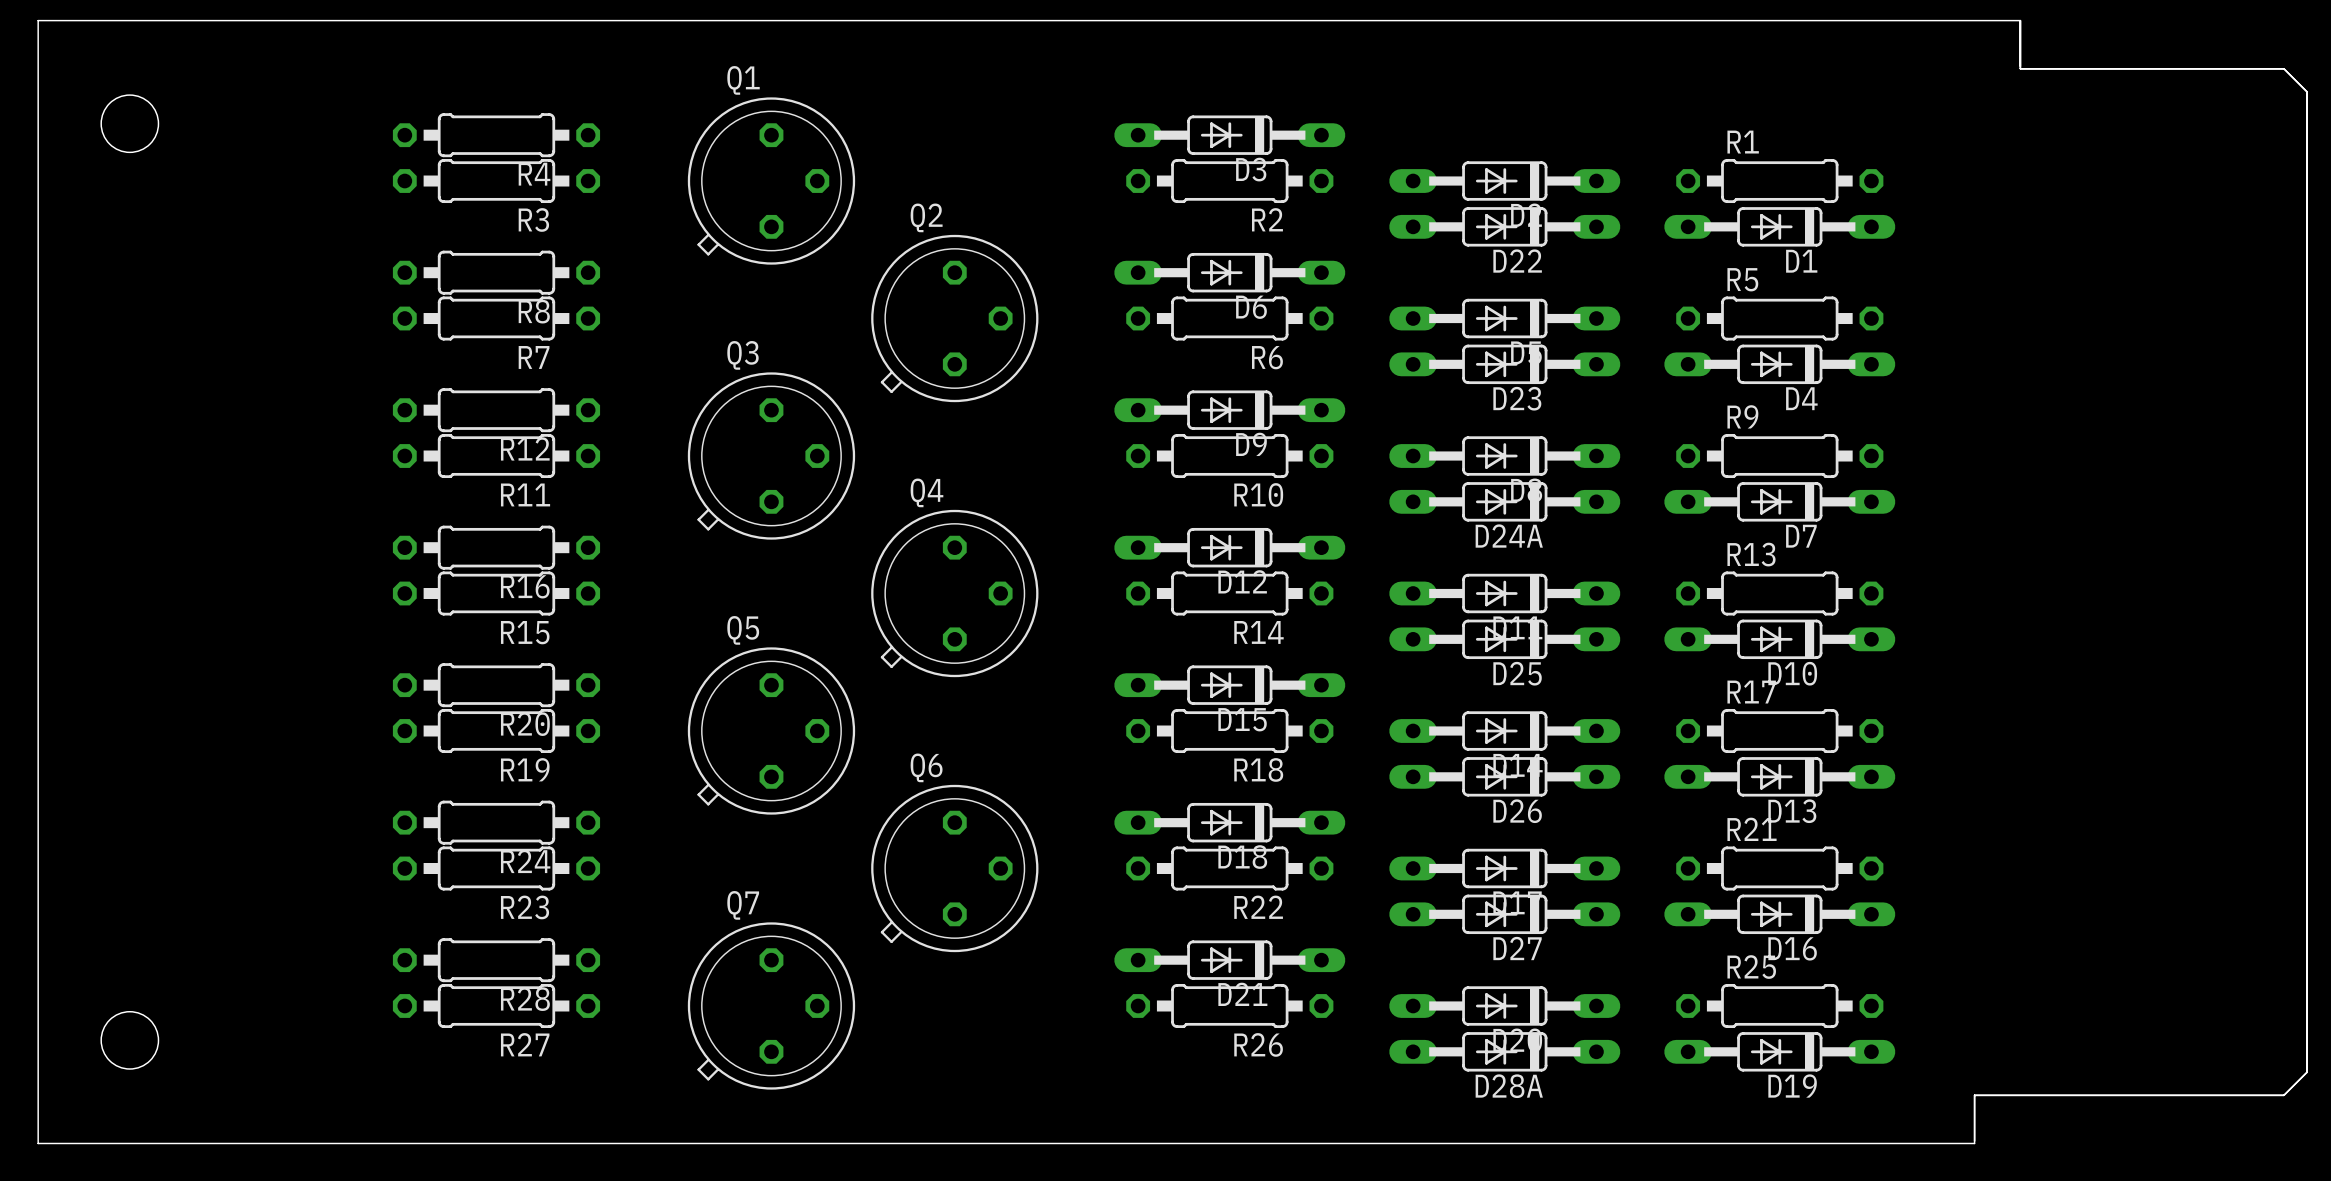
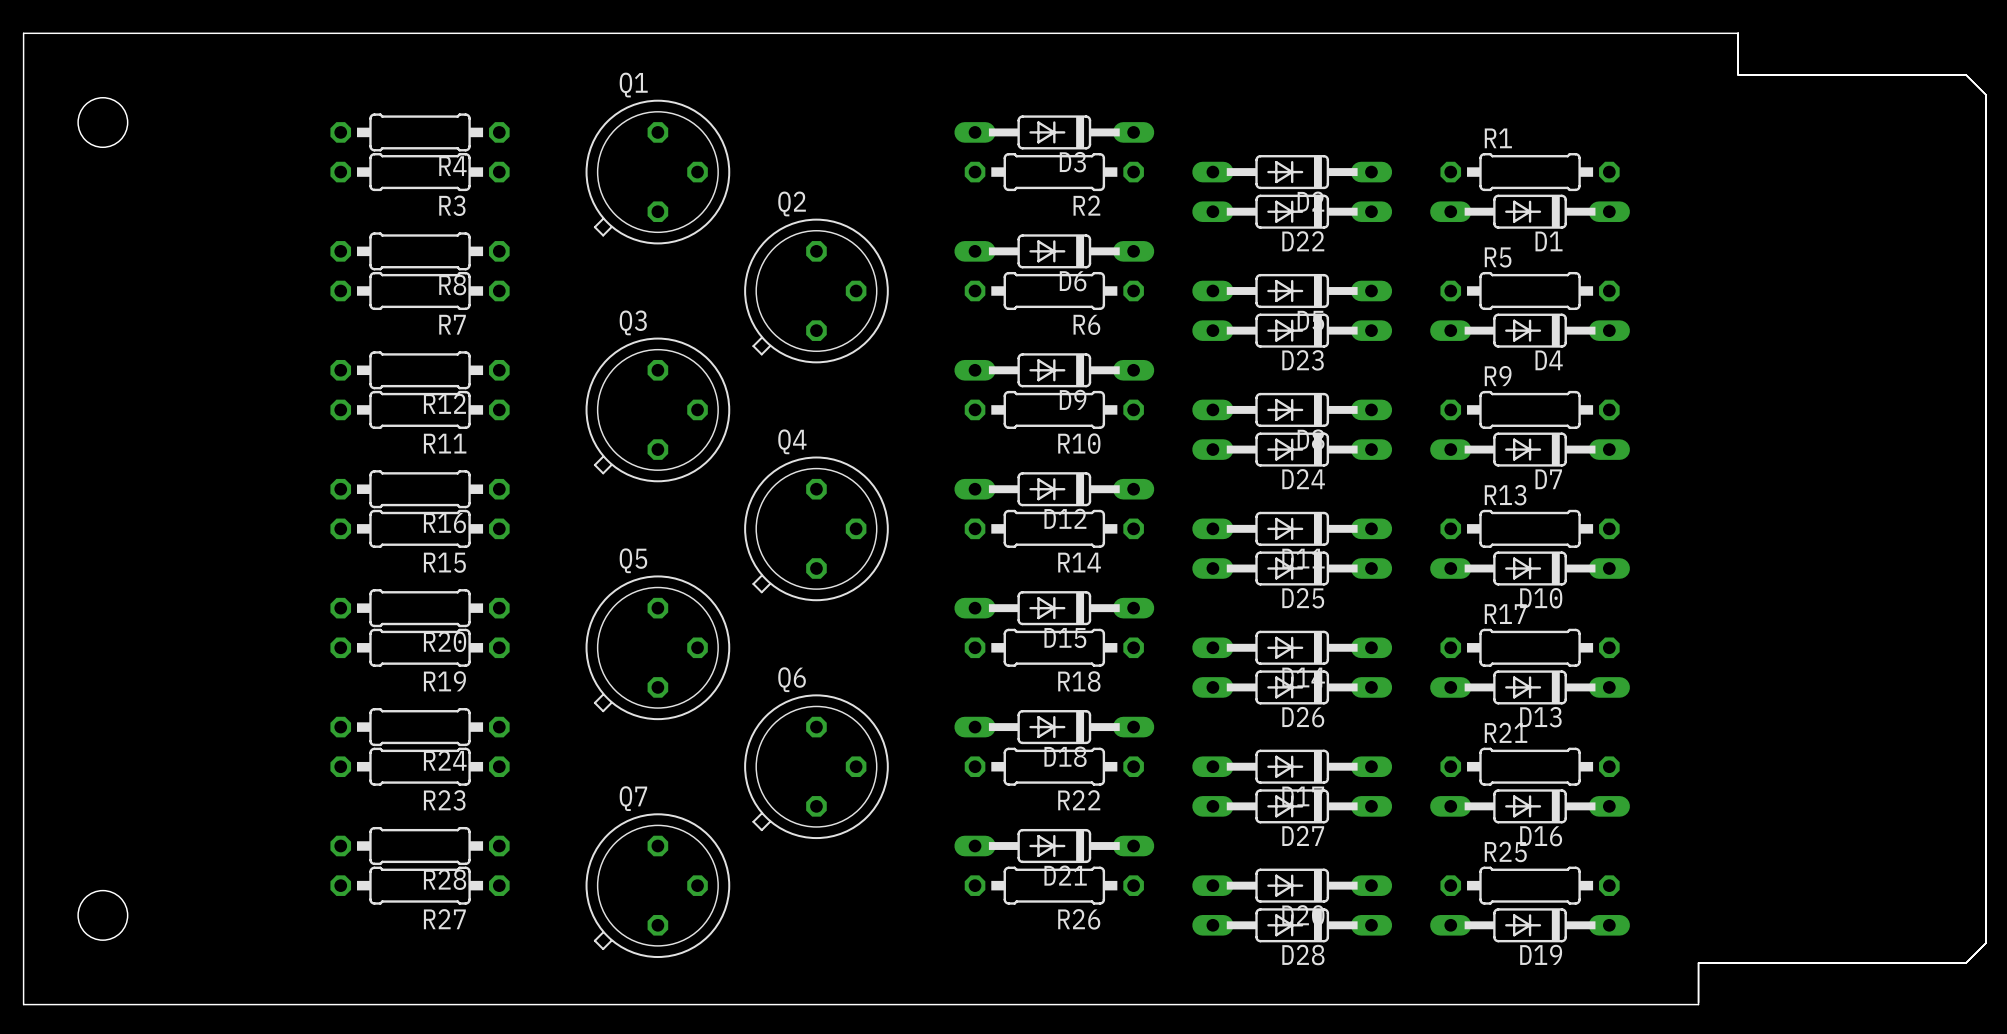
D24A name: D24A (1509, 536) -> D24 (1303, 479)
D28A name: D28A (1509, 1086) -> D28 (1303, 955)

